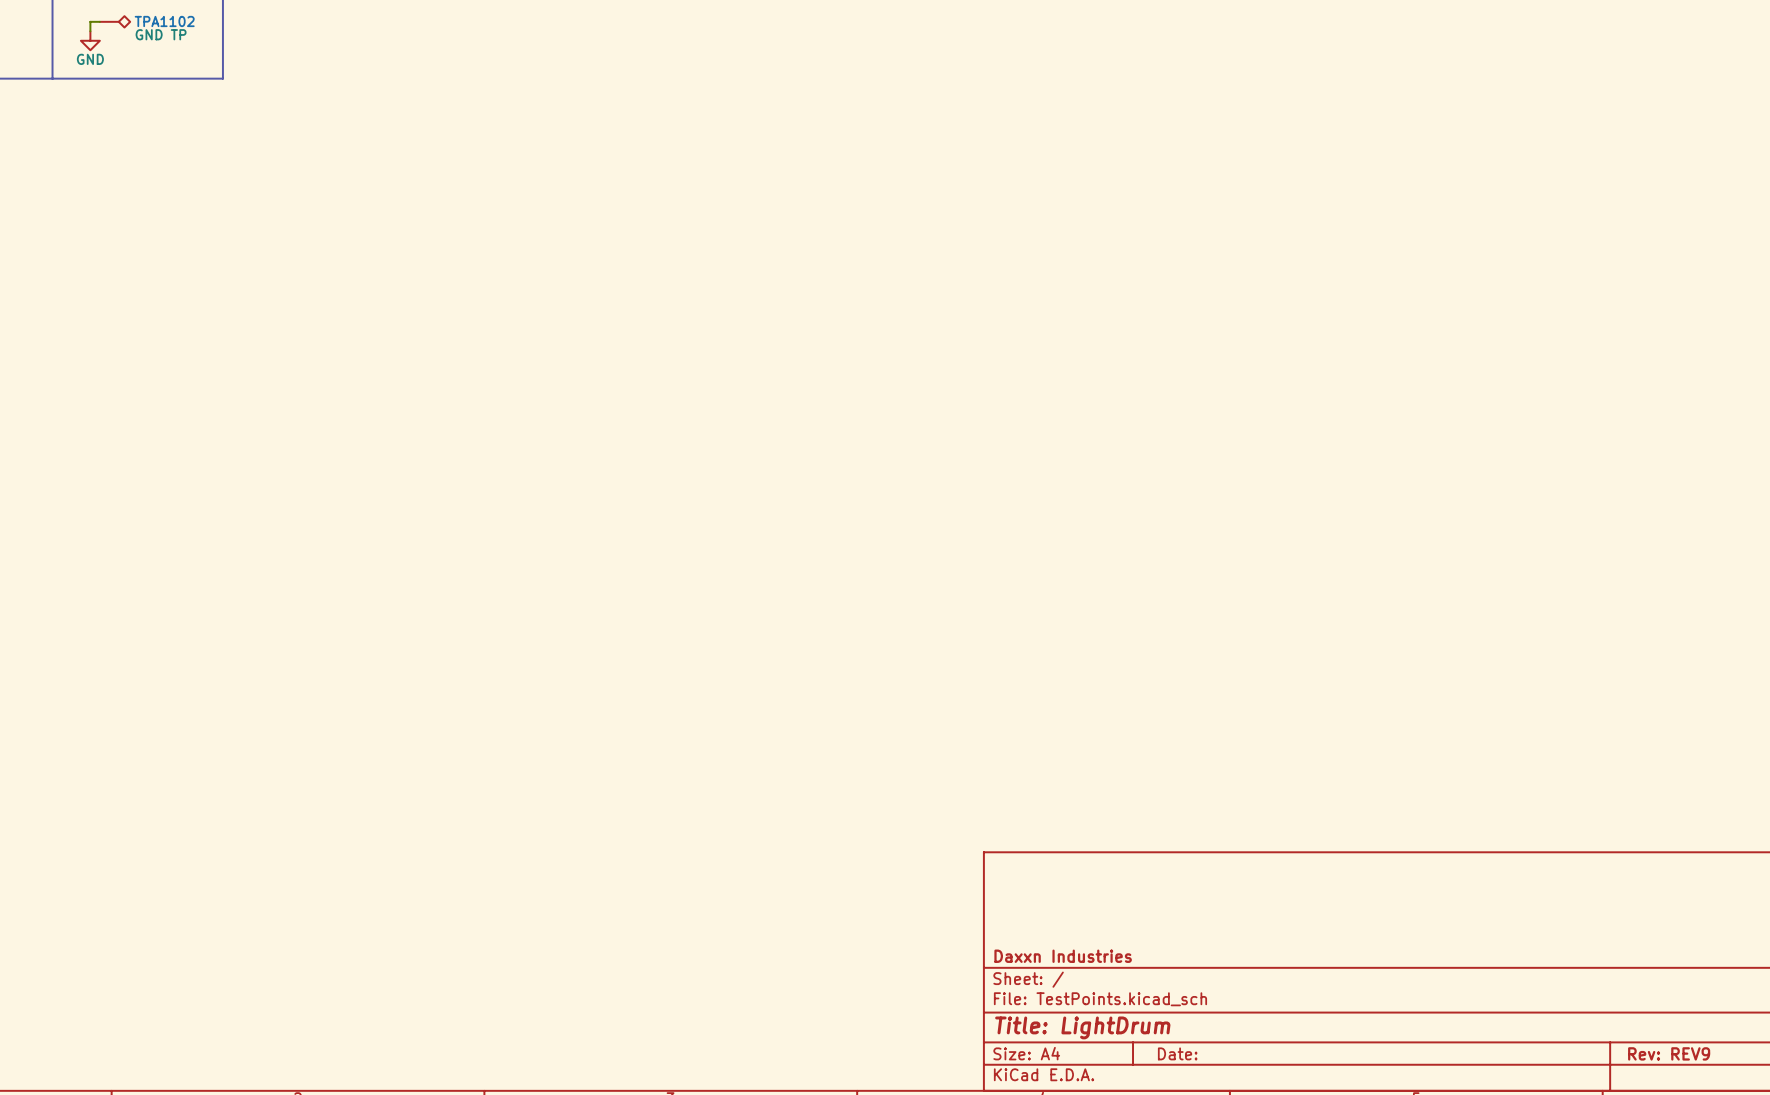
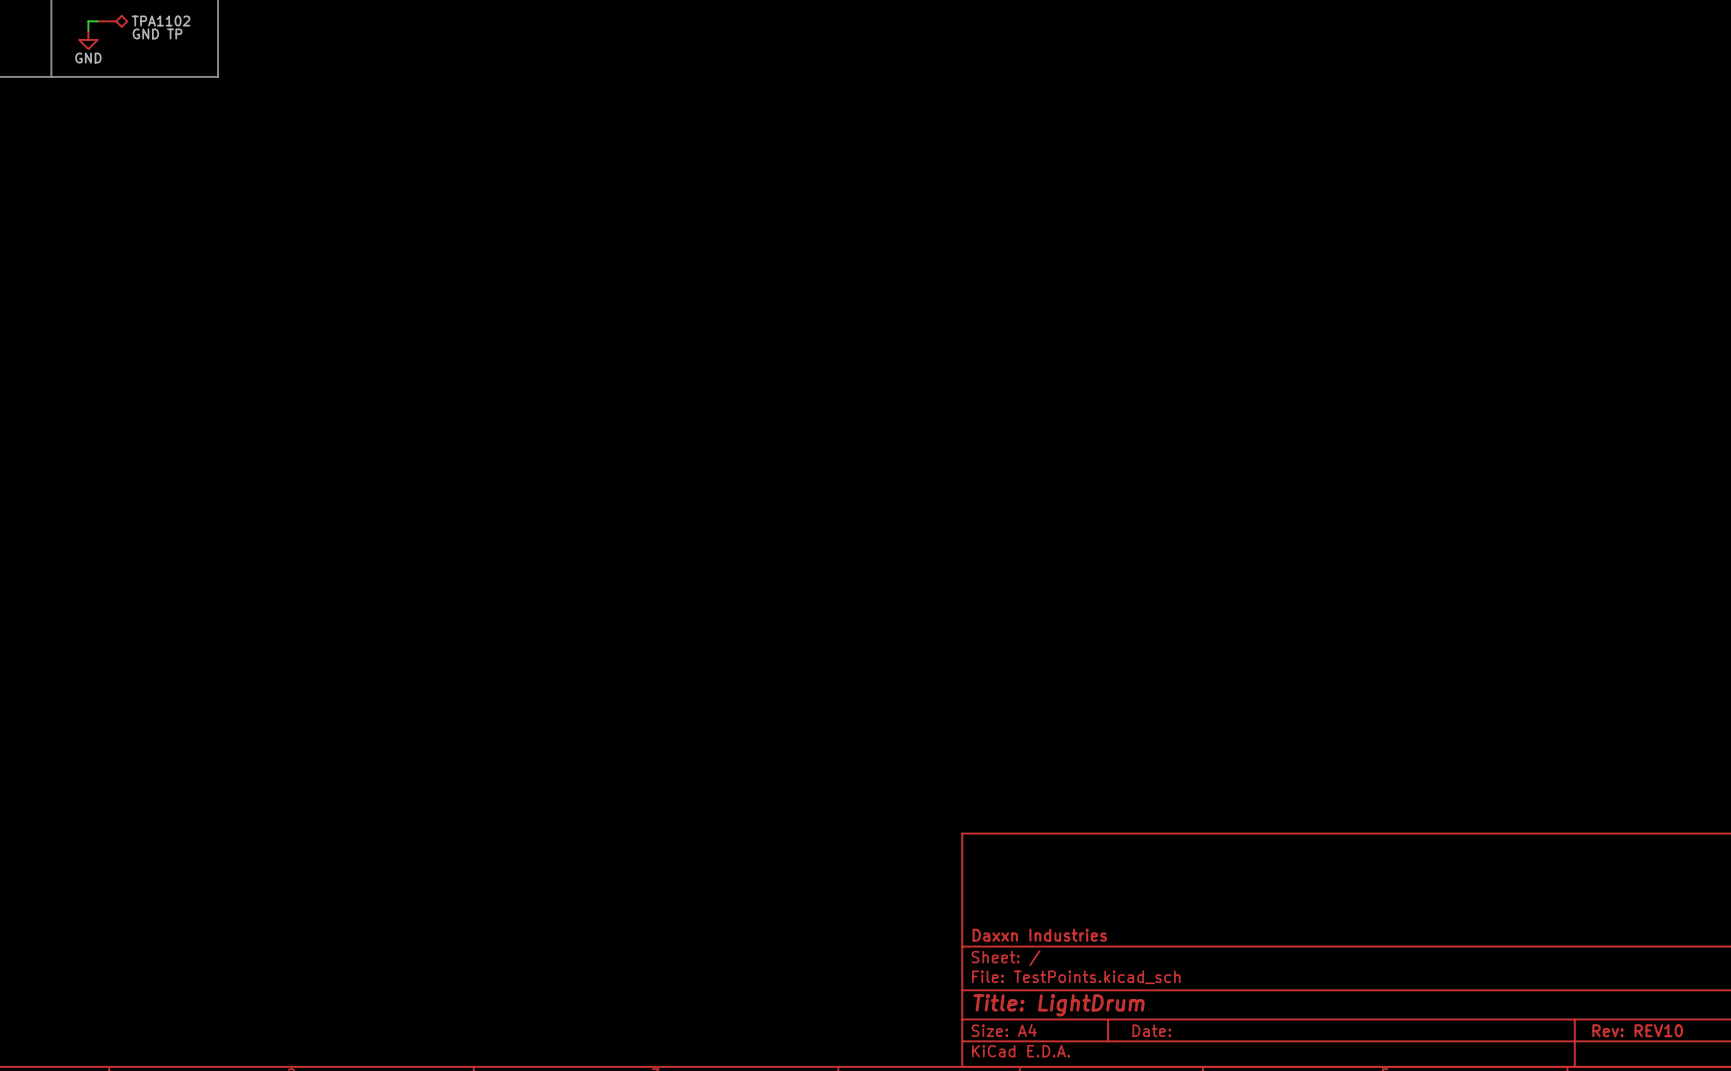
title block: Rev: REV9 (1669, 1053) -> Rev: REV10 (1637, 1030)

